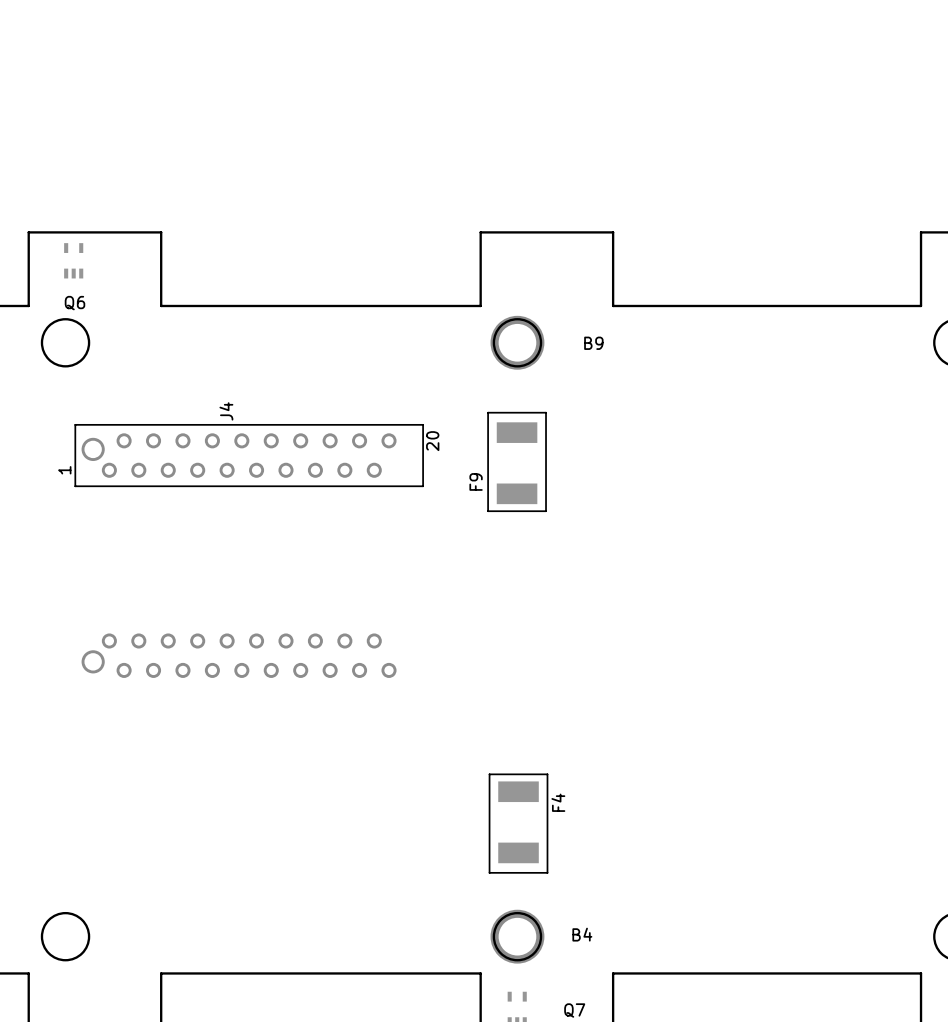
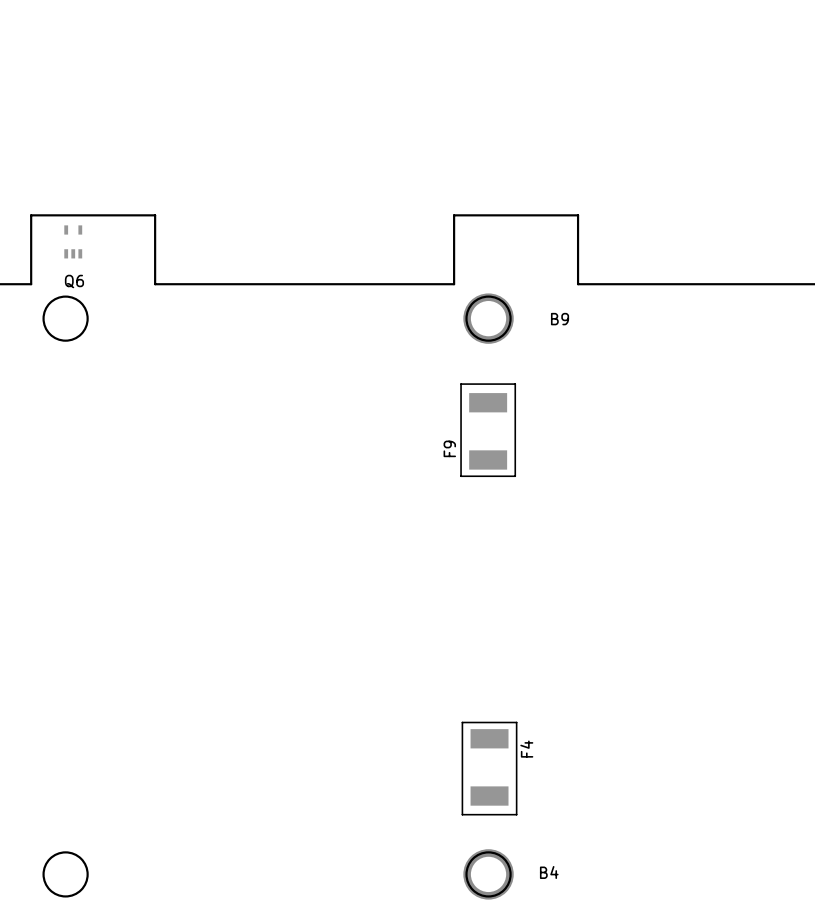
J4: (249, 455) -> none
part: (239, 655) -> none

